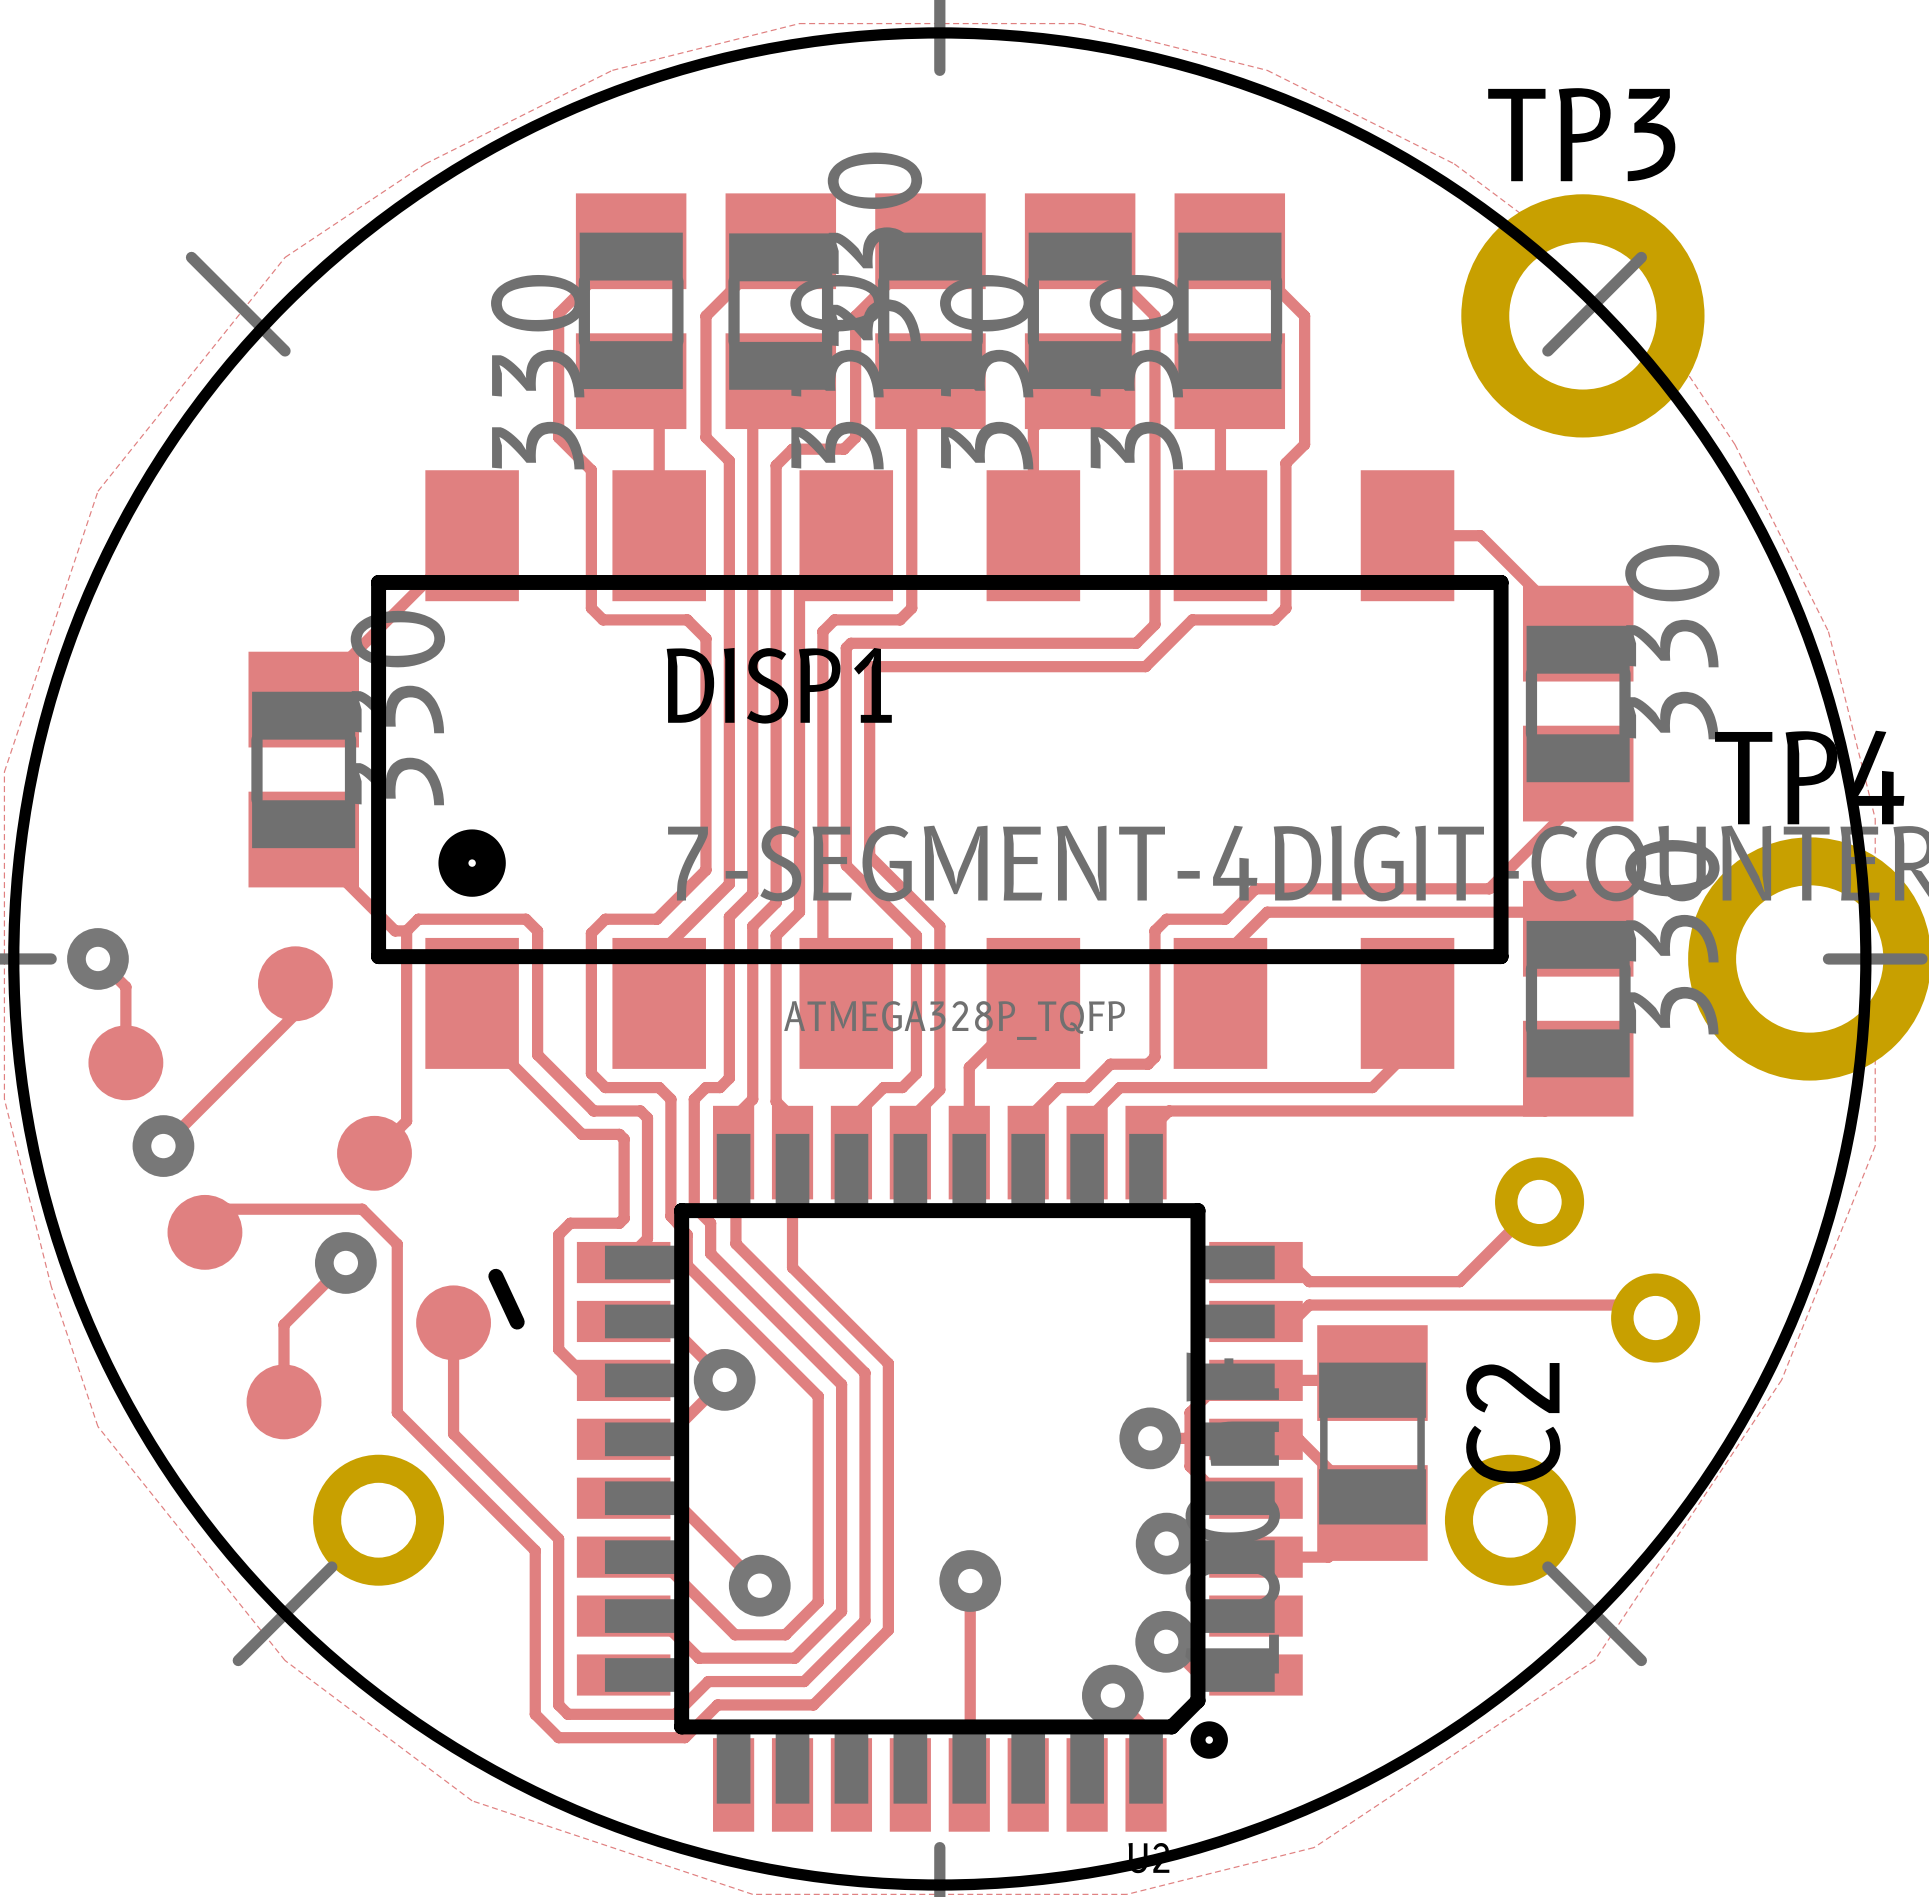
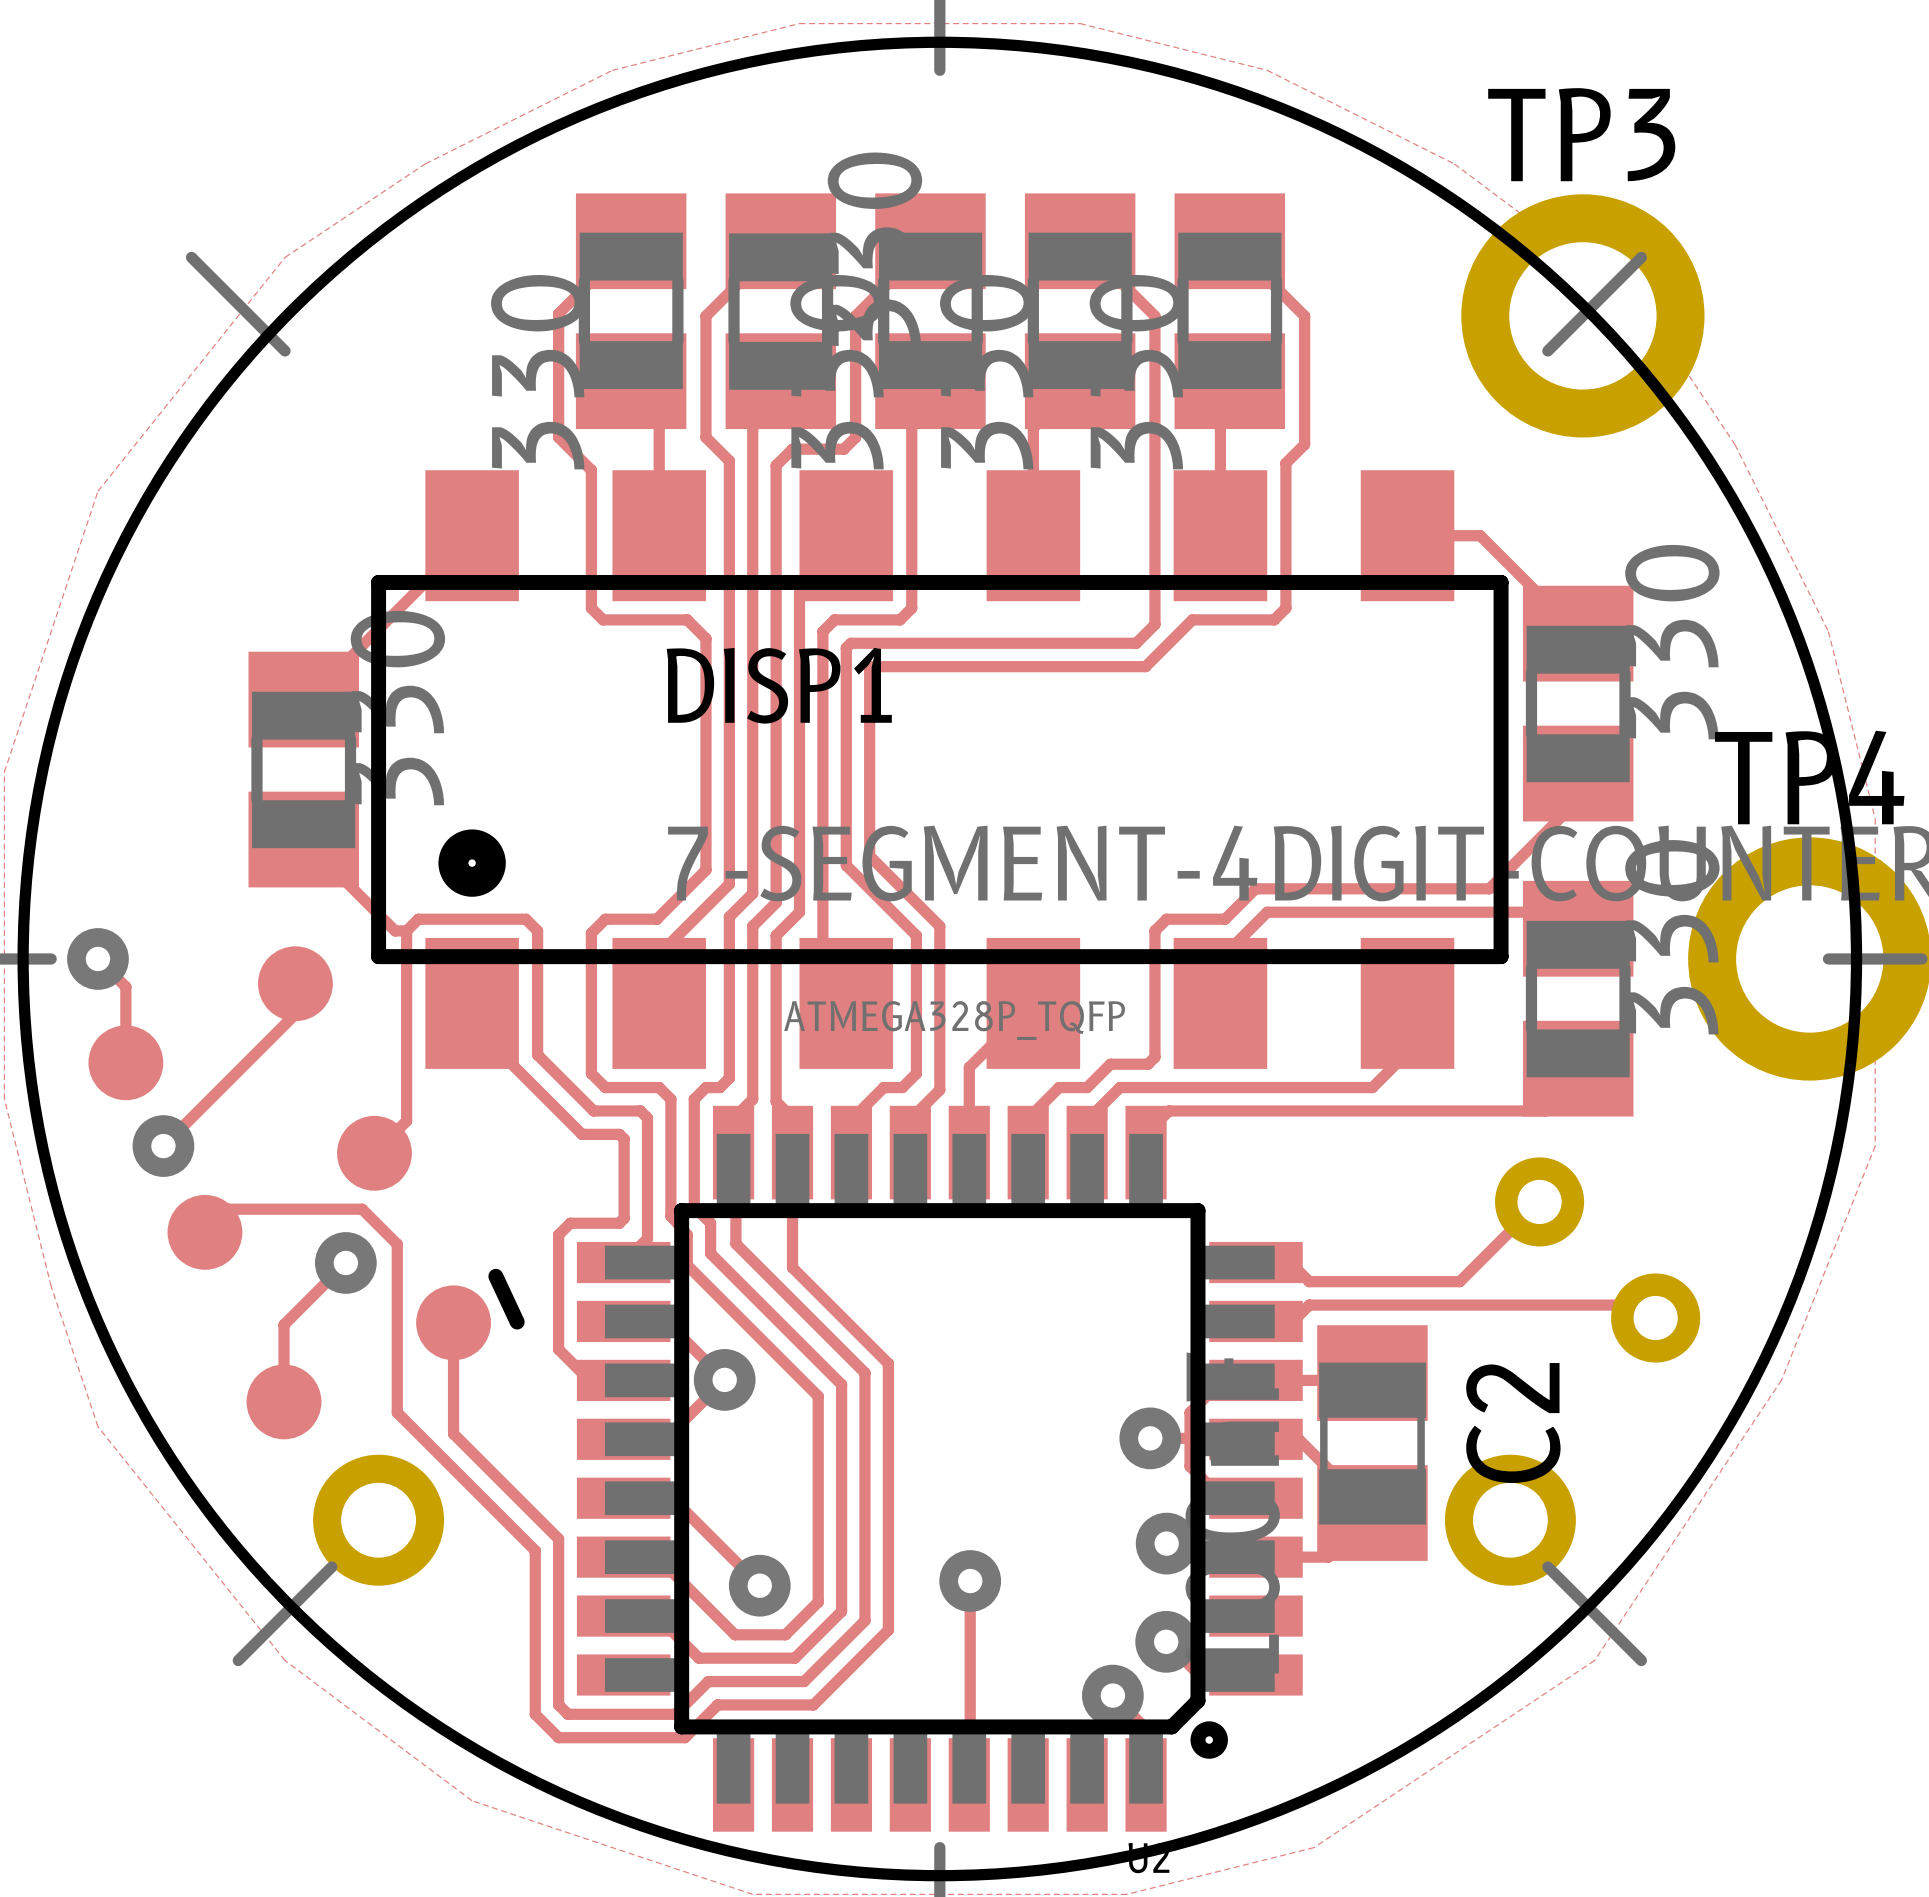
round board edge size: [8, 27, 1872, 1891] -> [17, 36, 1863, 1882]

